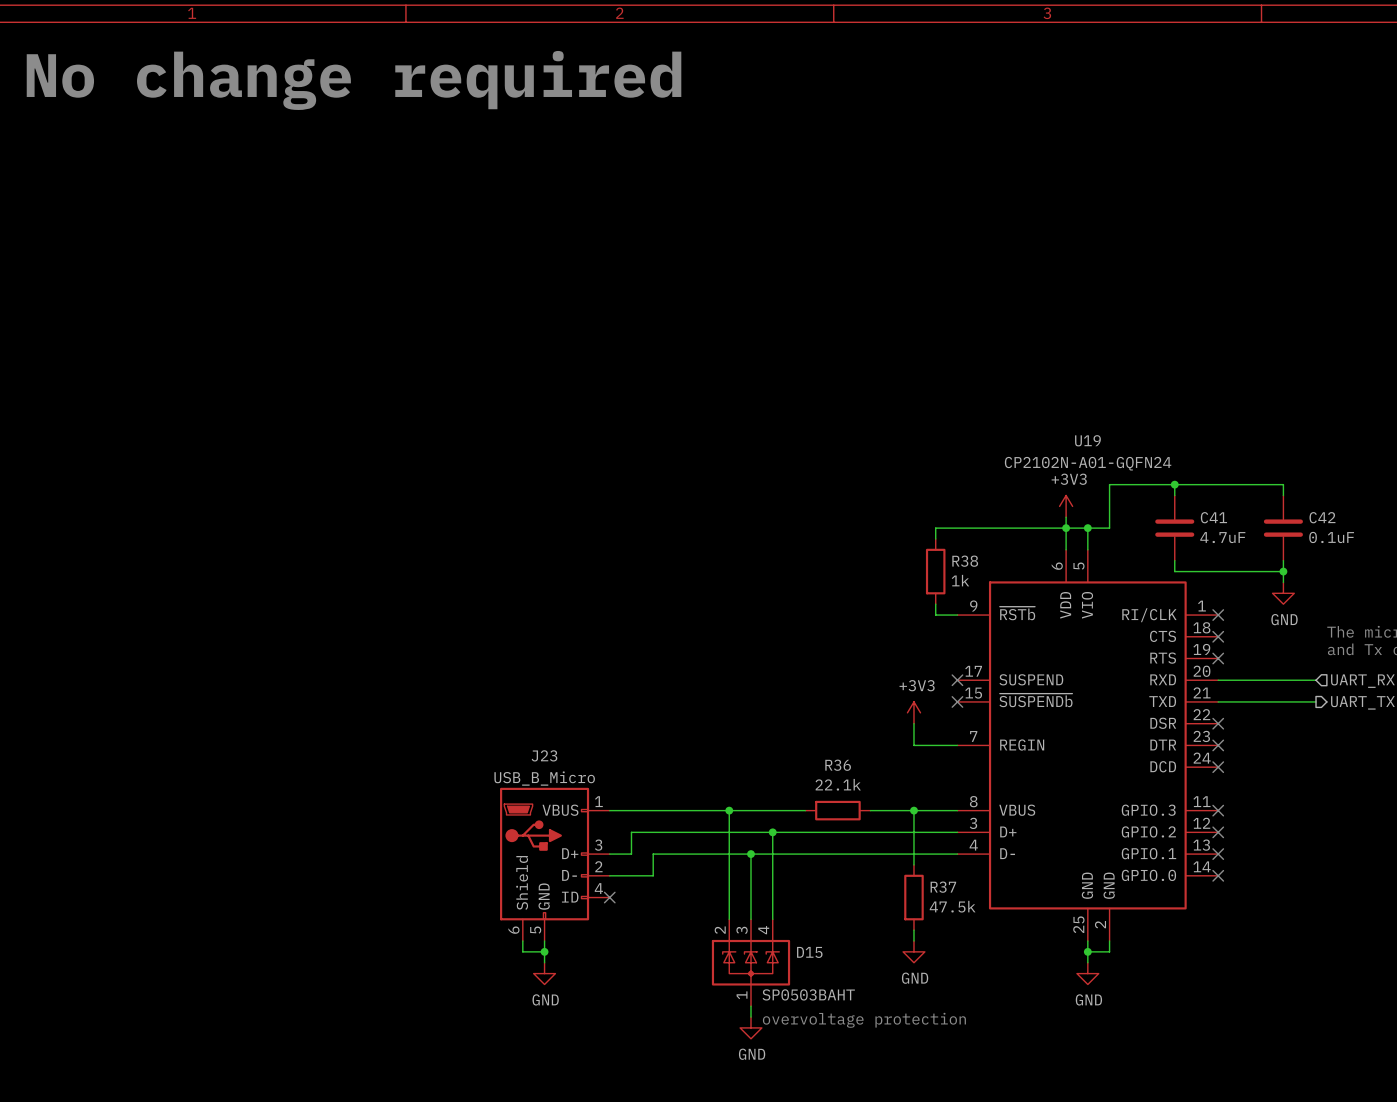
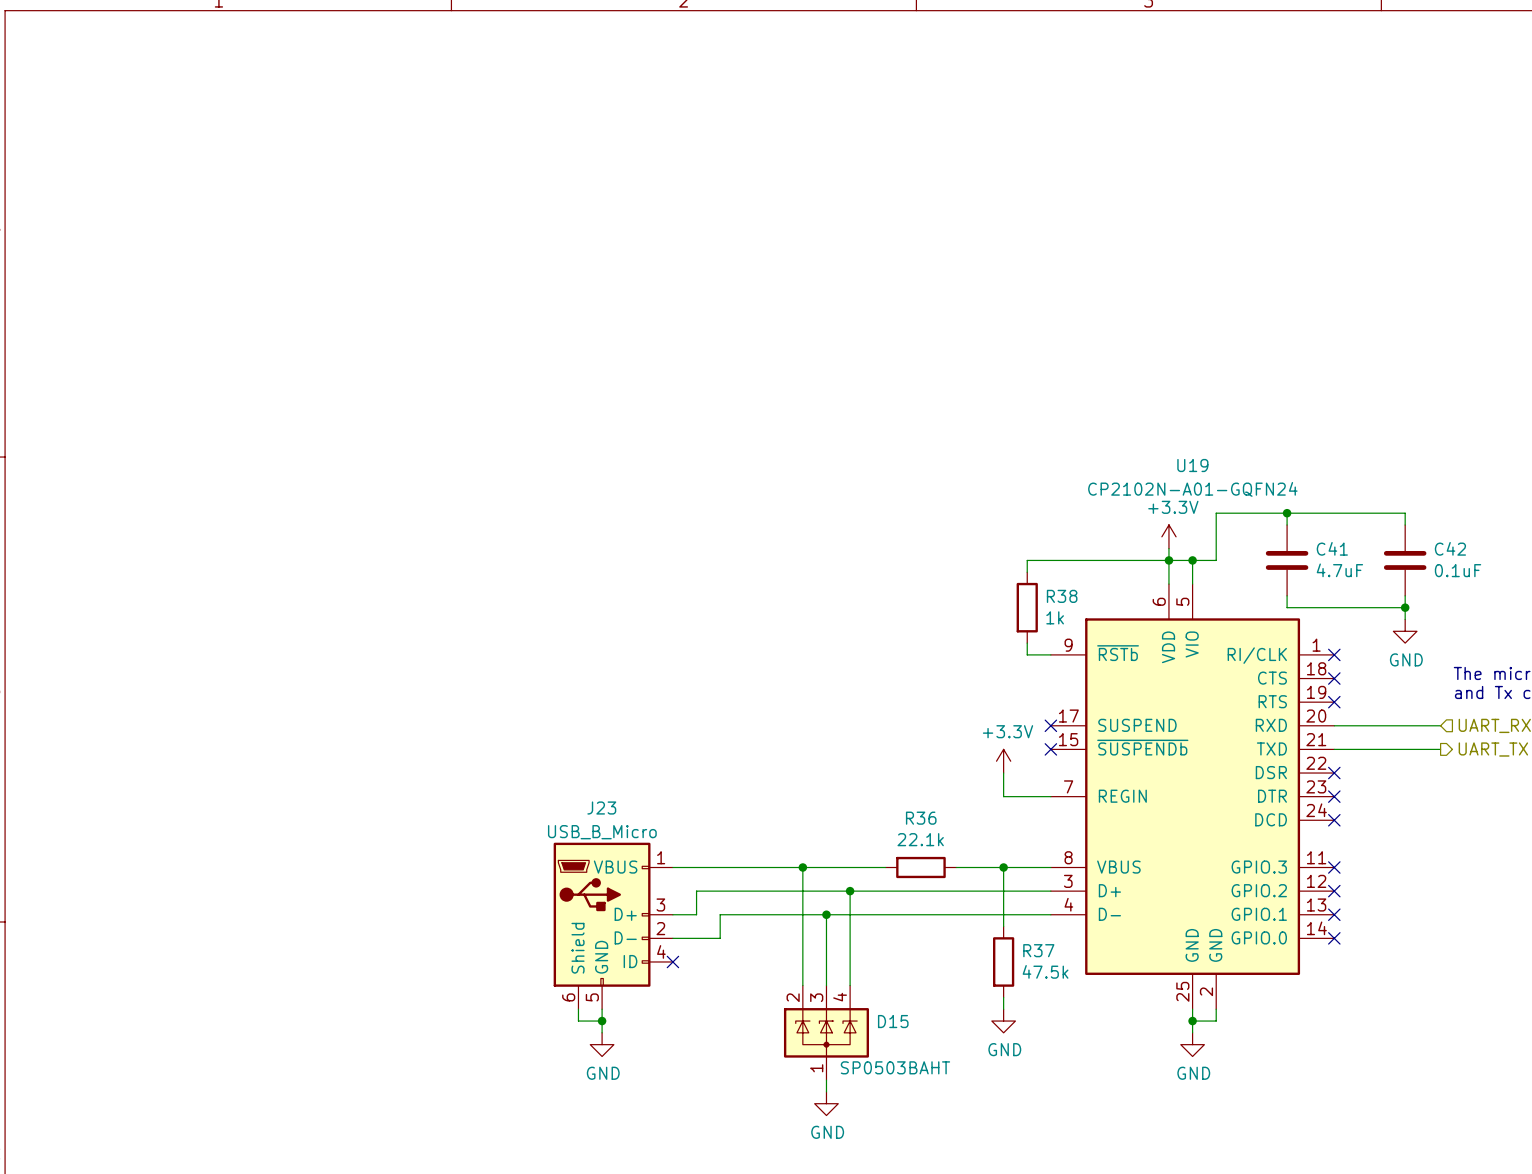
text: No change required (354, 80) -> none
power symbol: +3V3 (1066, 506) -> +3.3V (1168, 536)
power symbol: +3V3 (913, 712) -> +3.3V (1003, 761)
text: overvoltage protection (864, 1020) -> none

